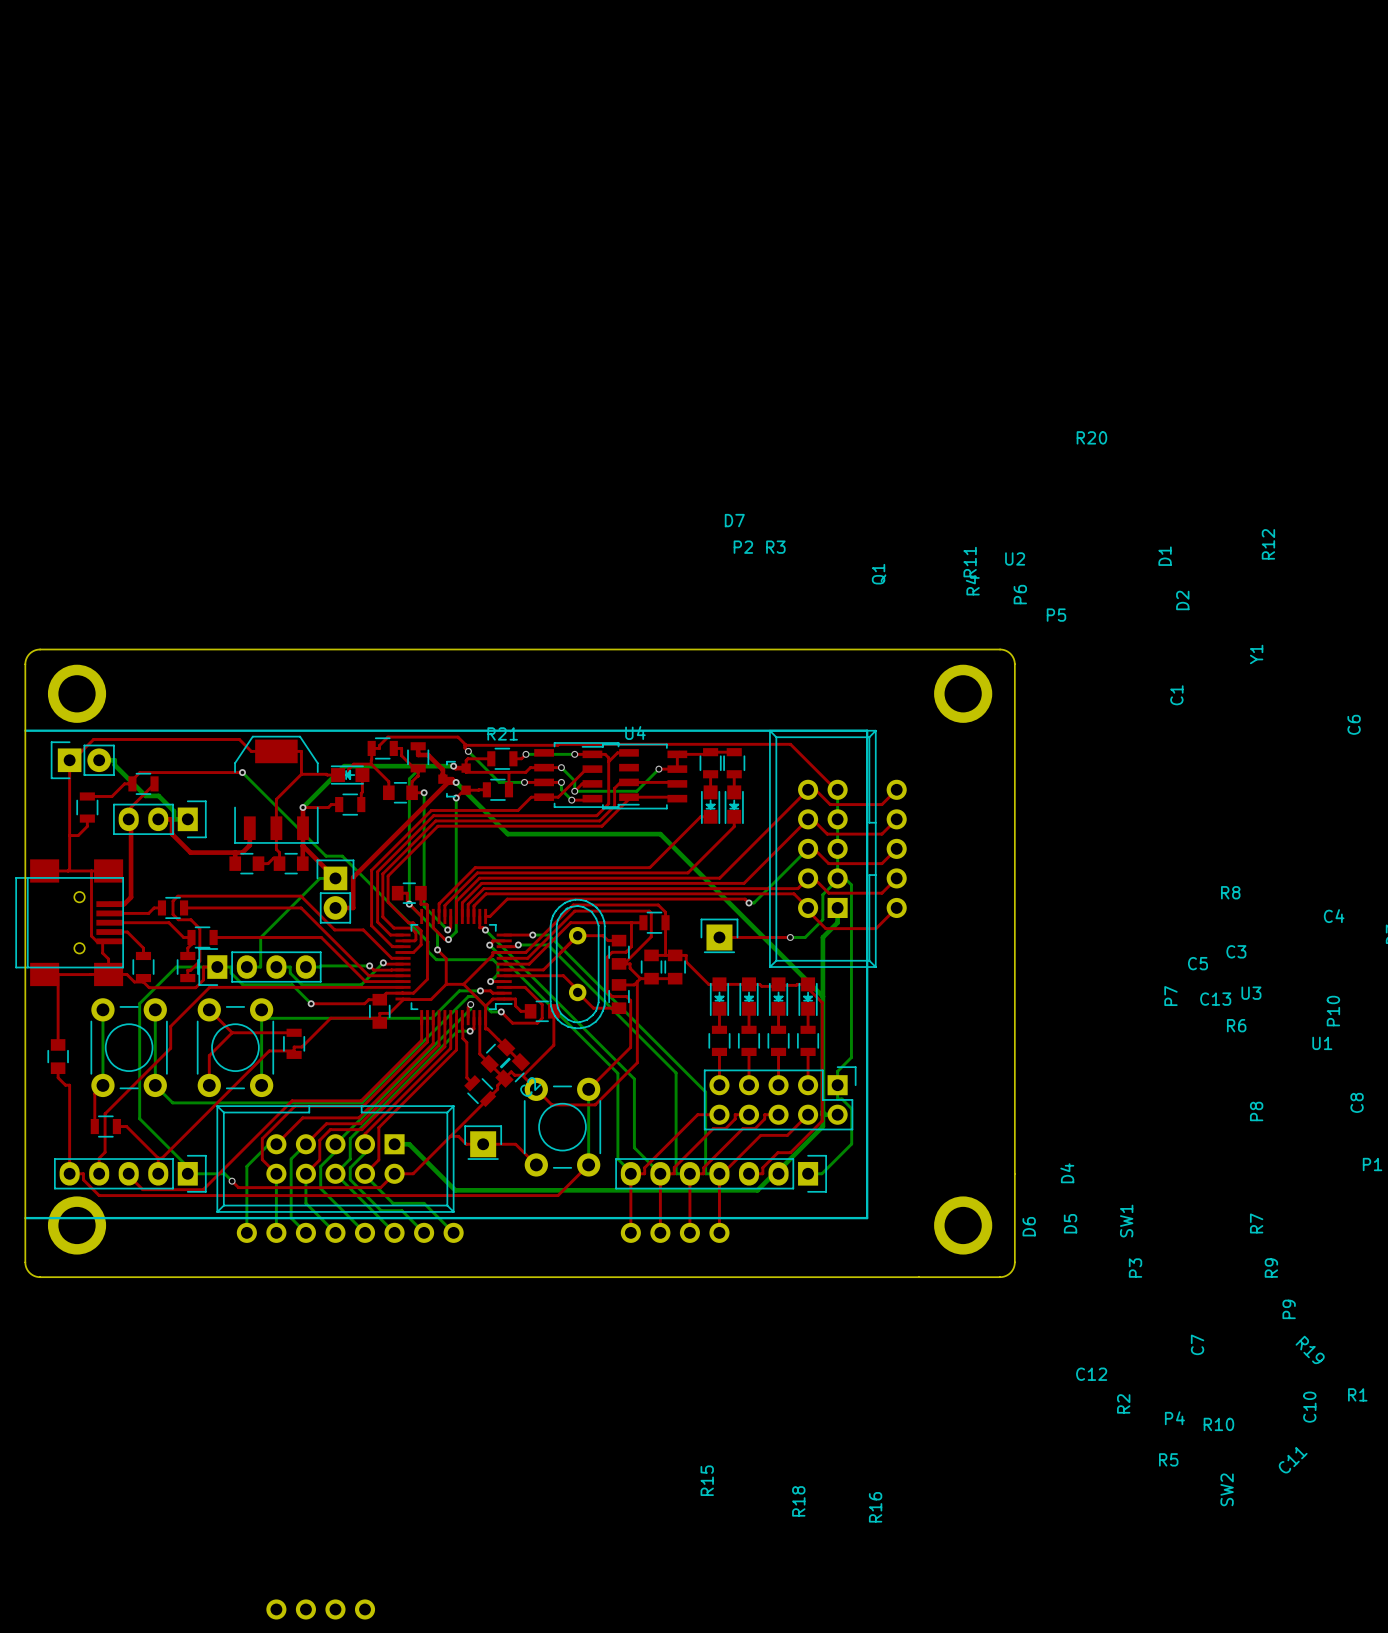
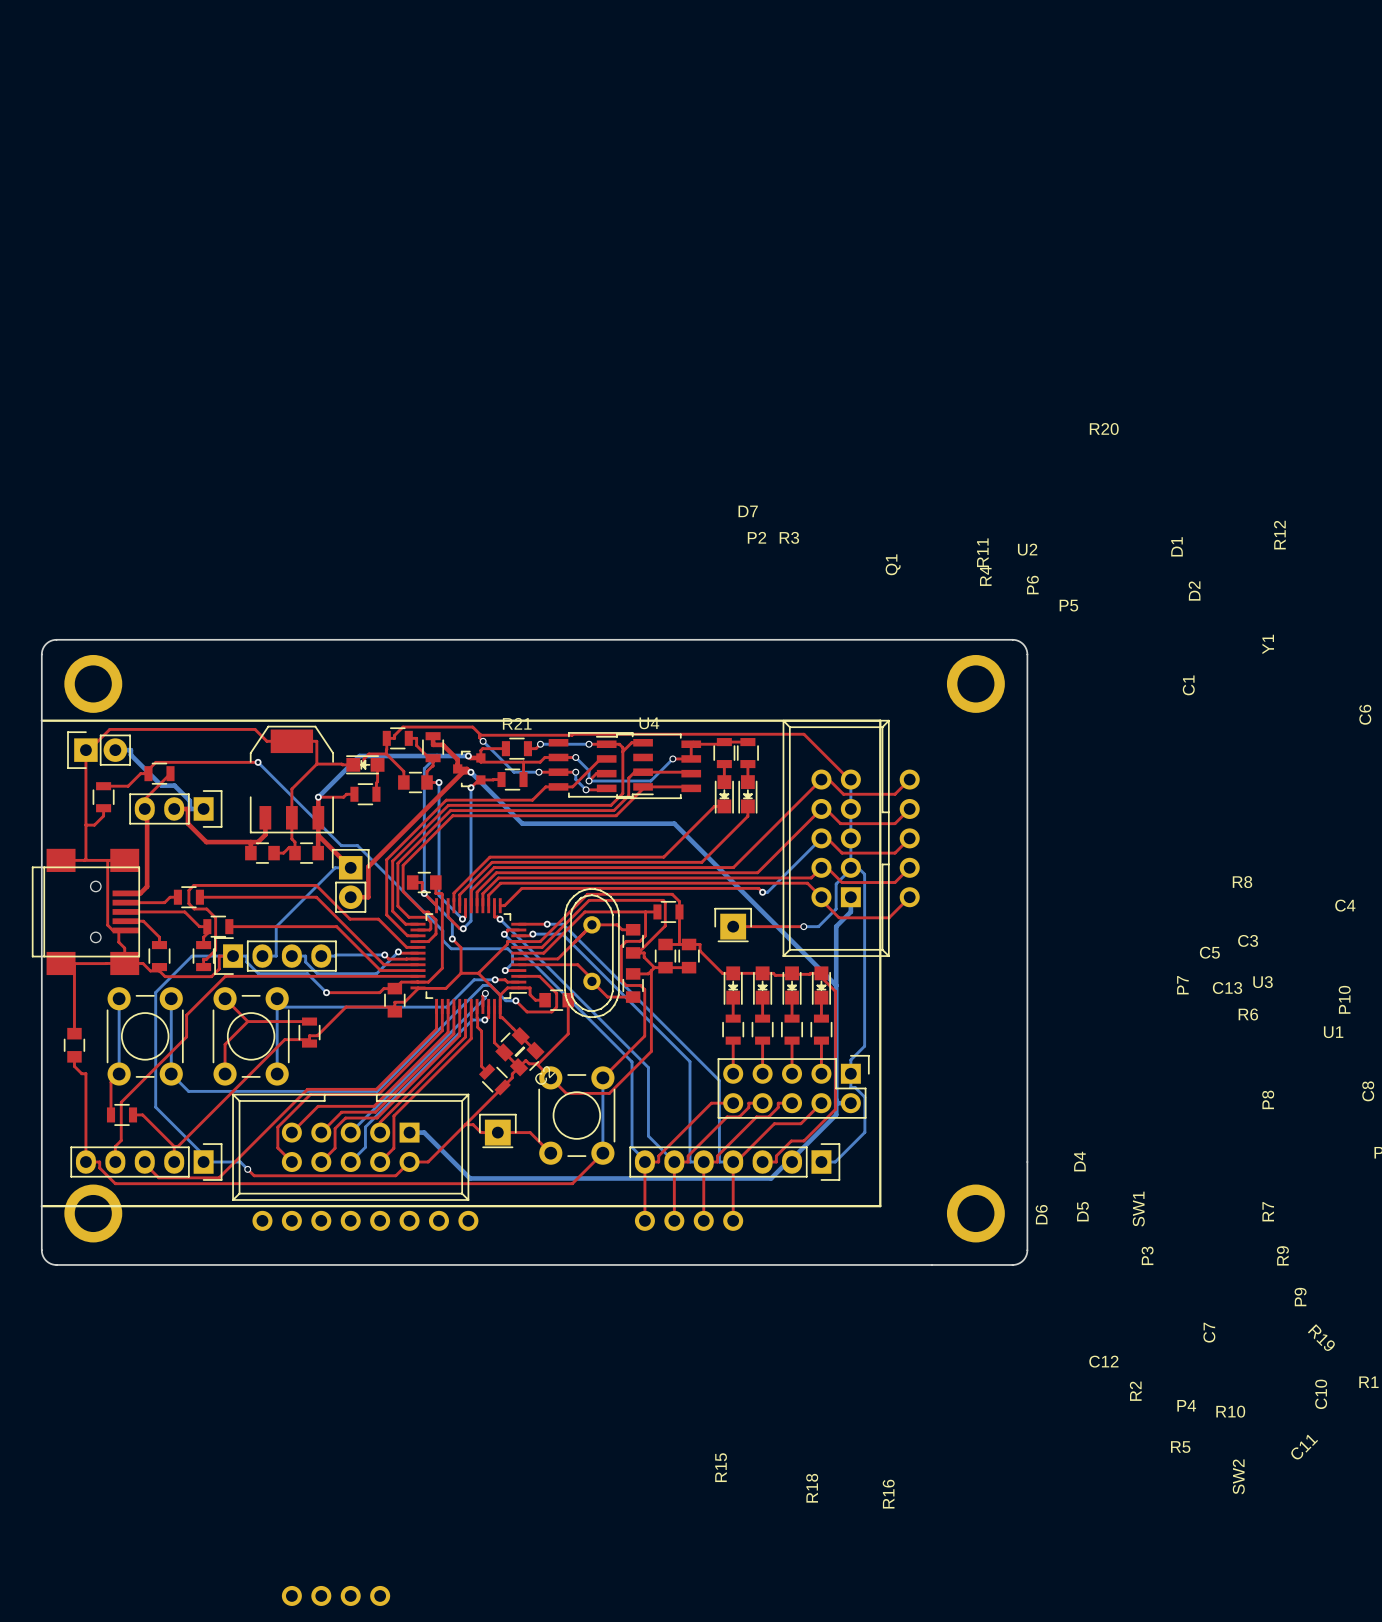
bottom track: (276, 1144) (269, 1144) (246, 1166) (246, 1232) -> none
bottom track: (305, 1144) (291, 1159) (291, 1218) (305, 1232) -> none
bottom track: (335, 1144) (335, 1151) (320, 1166) (320, 1188) (365, 1232) -> none
bottom track: (365, 1144) (365, 1153) (350, 1167) (350, 1179) (381, 1210) (401, 1210) (424, 1232) -> none
bottom track: (276, 1173) (276, 1232) -> none
bottom track: (305, 1173) (305, 1203) (335, 1232) -> none
bottom track: (335, 1173) (394, 1232) -> none
bottom track: (365, 1173) (393, 1203) (424, 1203) (453, 1232) -> none

